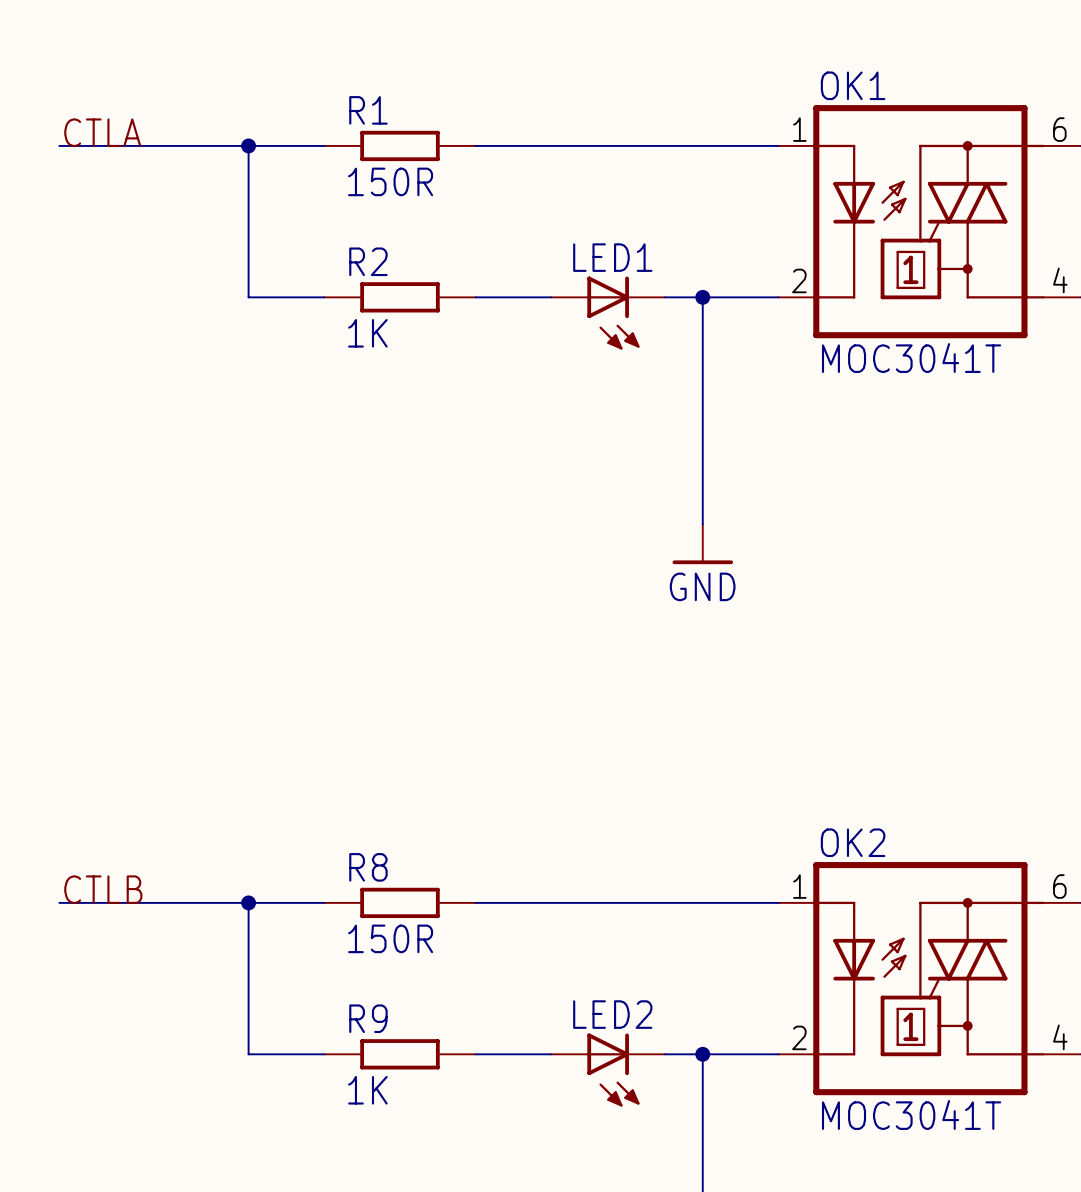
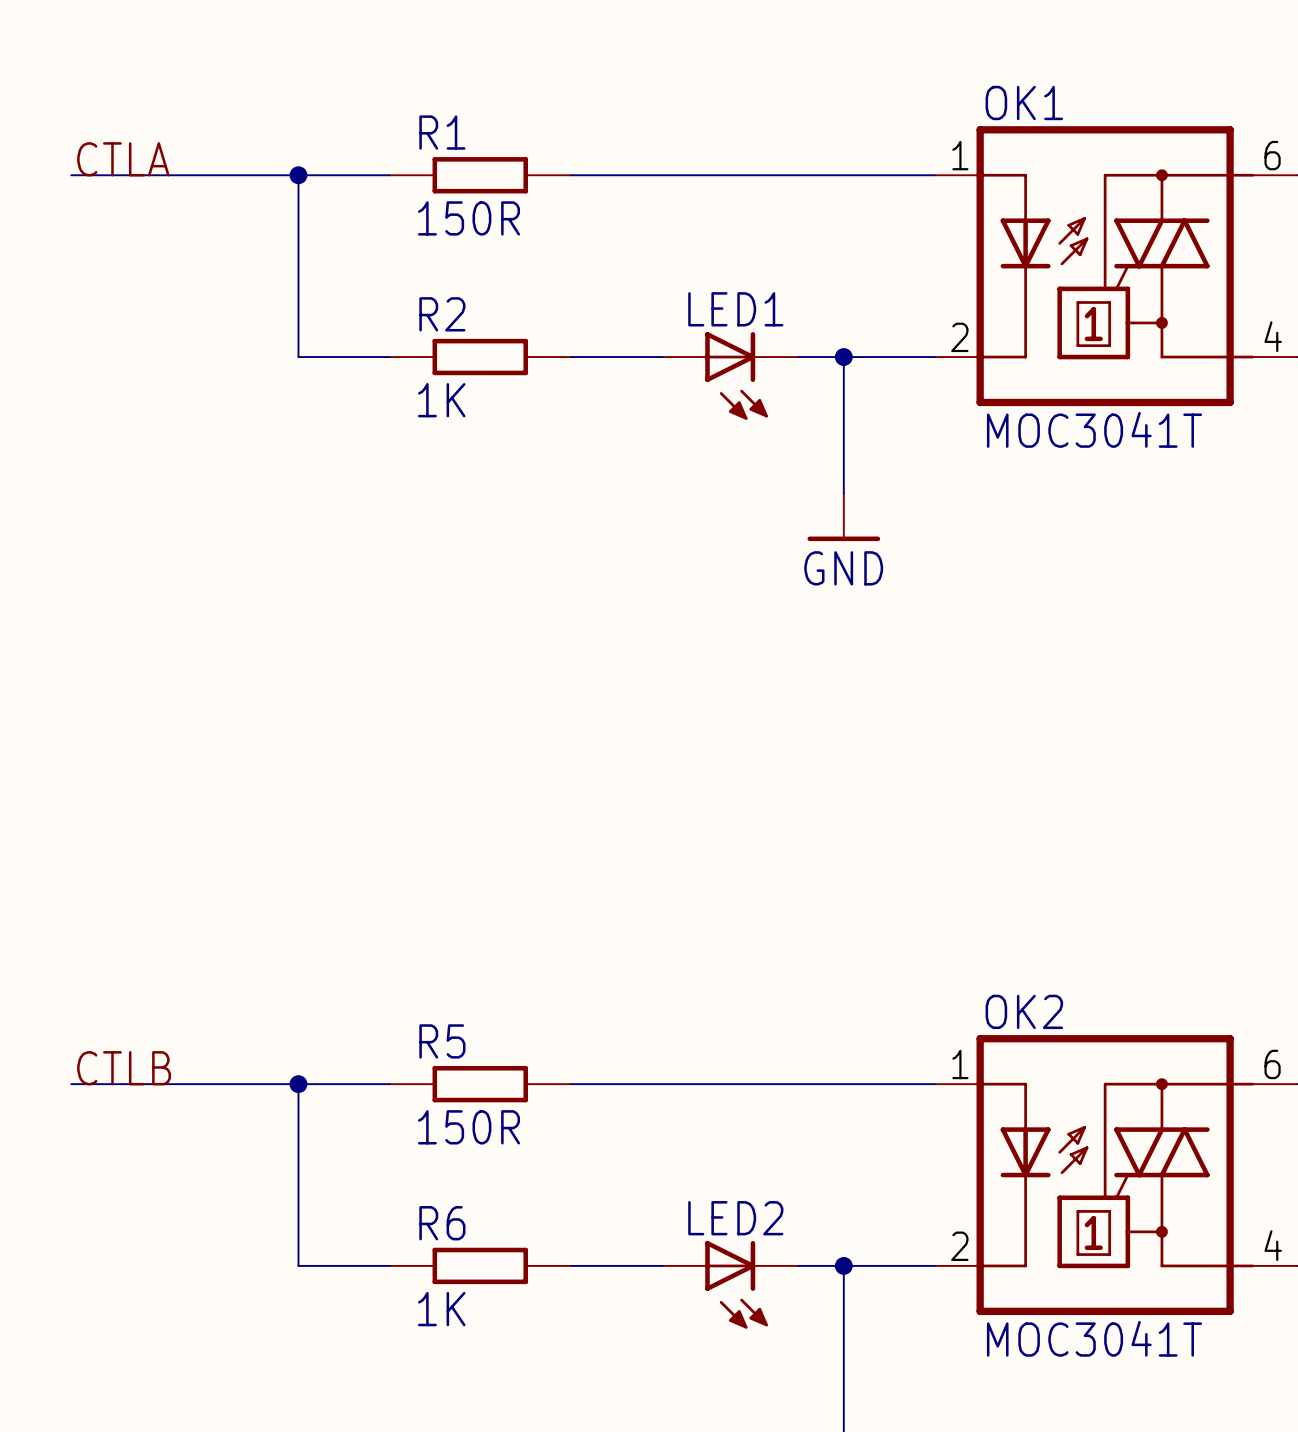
wire: (702, 410) (702, 524) -> none
power symbol position: GND (702, 544) -> GND (843, 517)
R8 name: R8 (368, 867) -> R5 (442, 1041)
R9 name: R9 (368, 1018) -> R6 (442, 1223)

